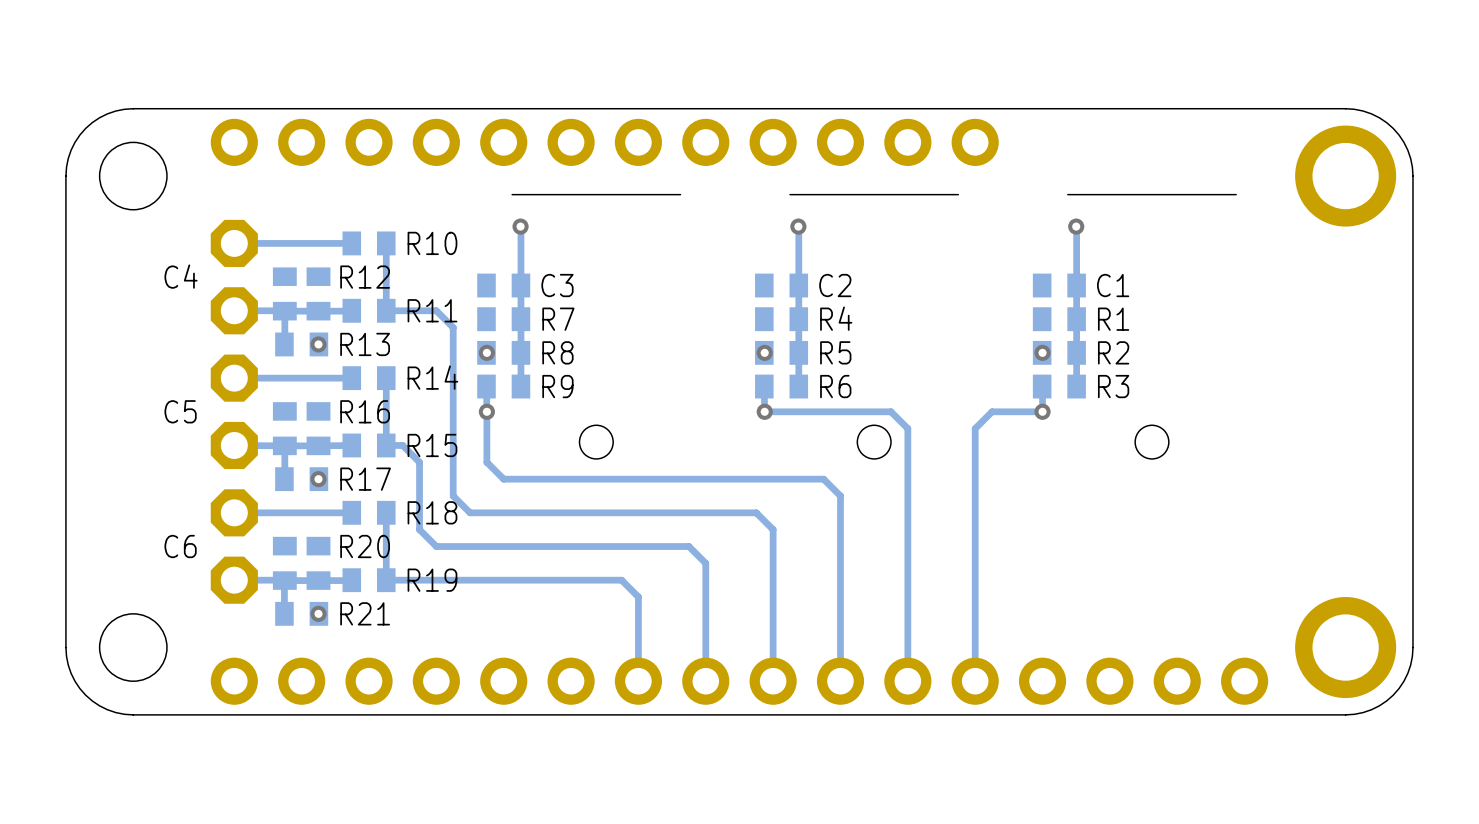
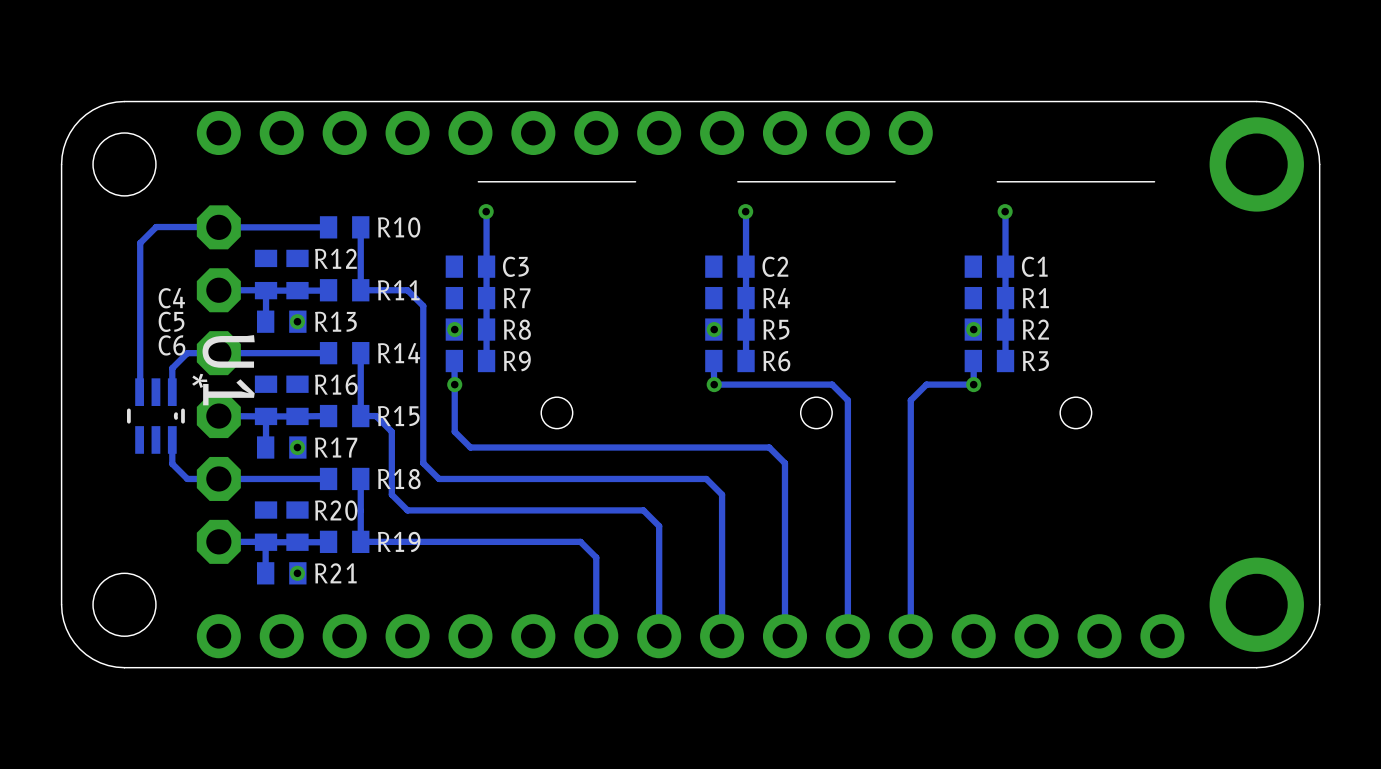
track: none -> (218, 227) (156, 227) (140, 243) (139, 392)
C4 name position: C4 (181, 276) -> C4 (171, 298)
track: none -> (218, 353) (187, 353) (172, 368) (172, 392)
C5 name position: C5 (180, 411) -> C5 (171, 321)
U1: none -> (155, 416)
track: none -> (172, 439) (172, 463) (187, 478) (218, 478)
C6 name position: C6 (180, 546) -> C6 (171, 345)

